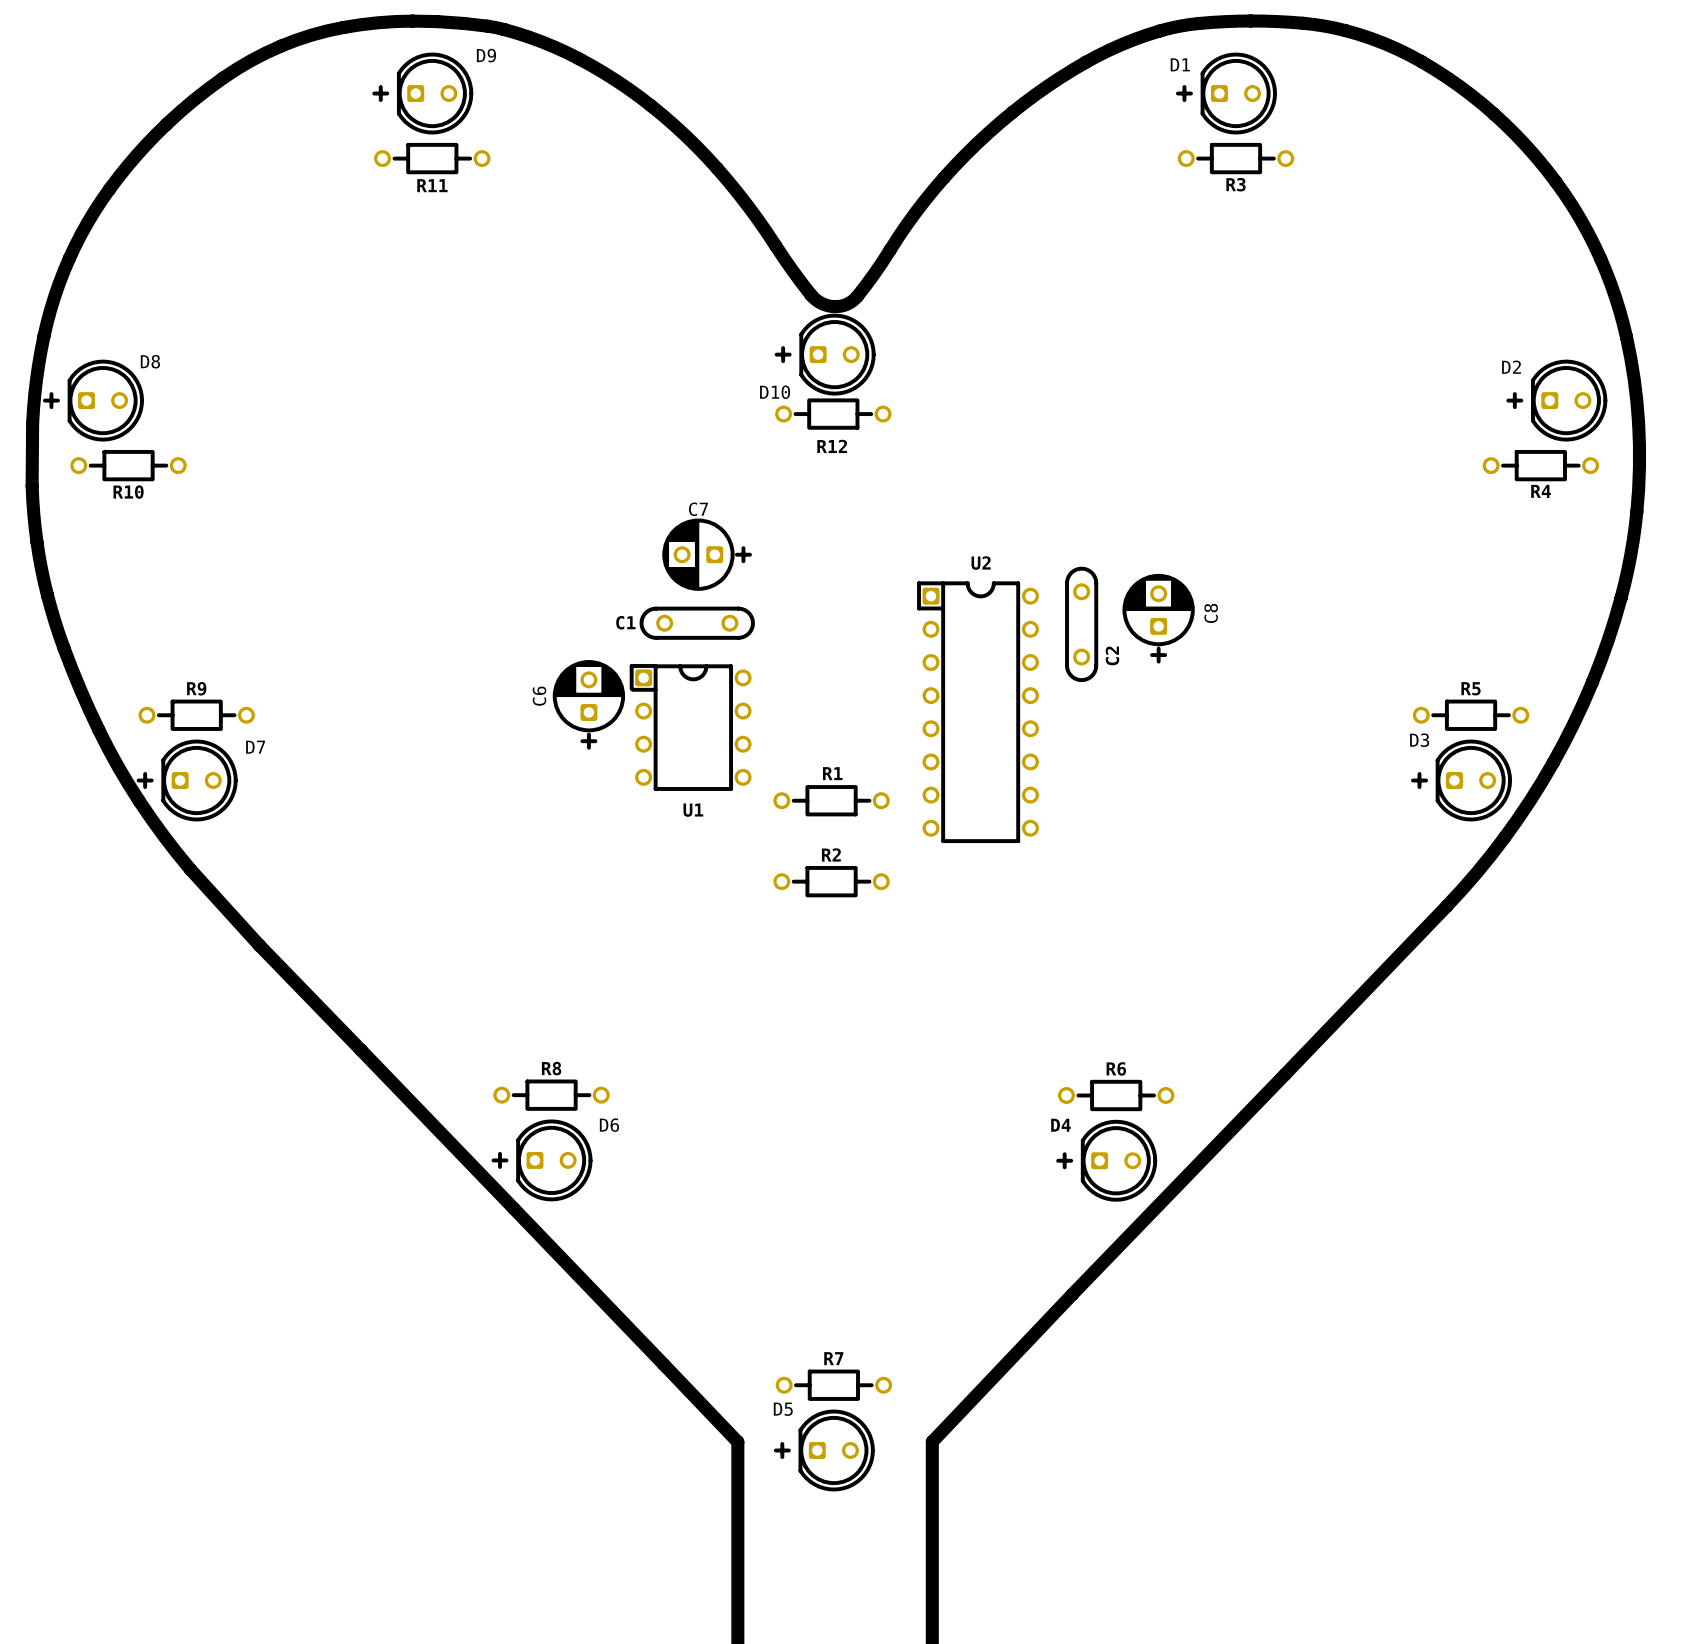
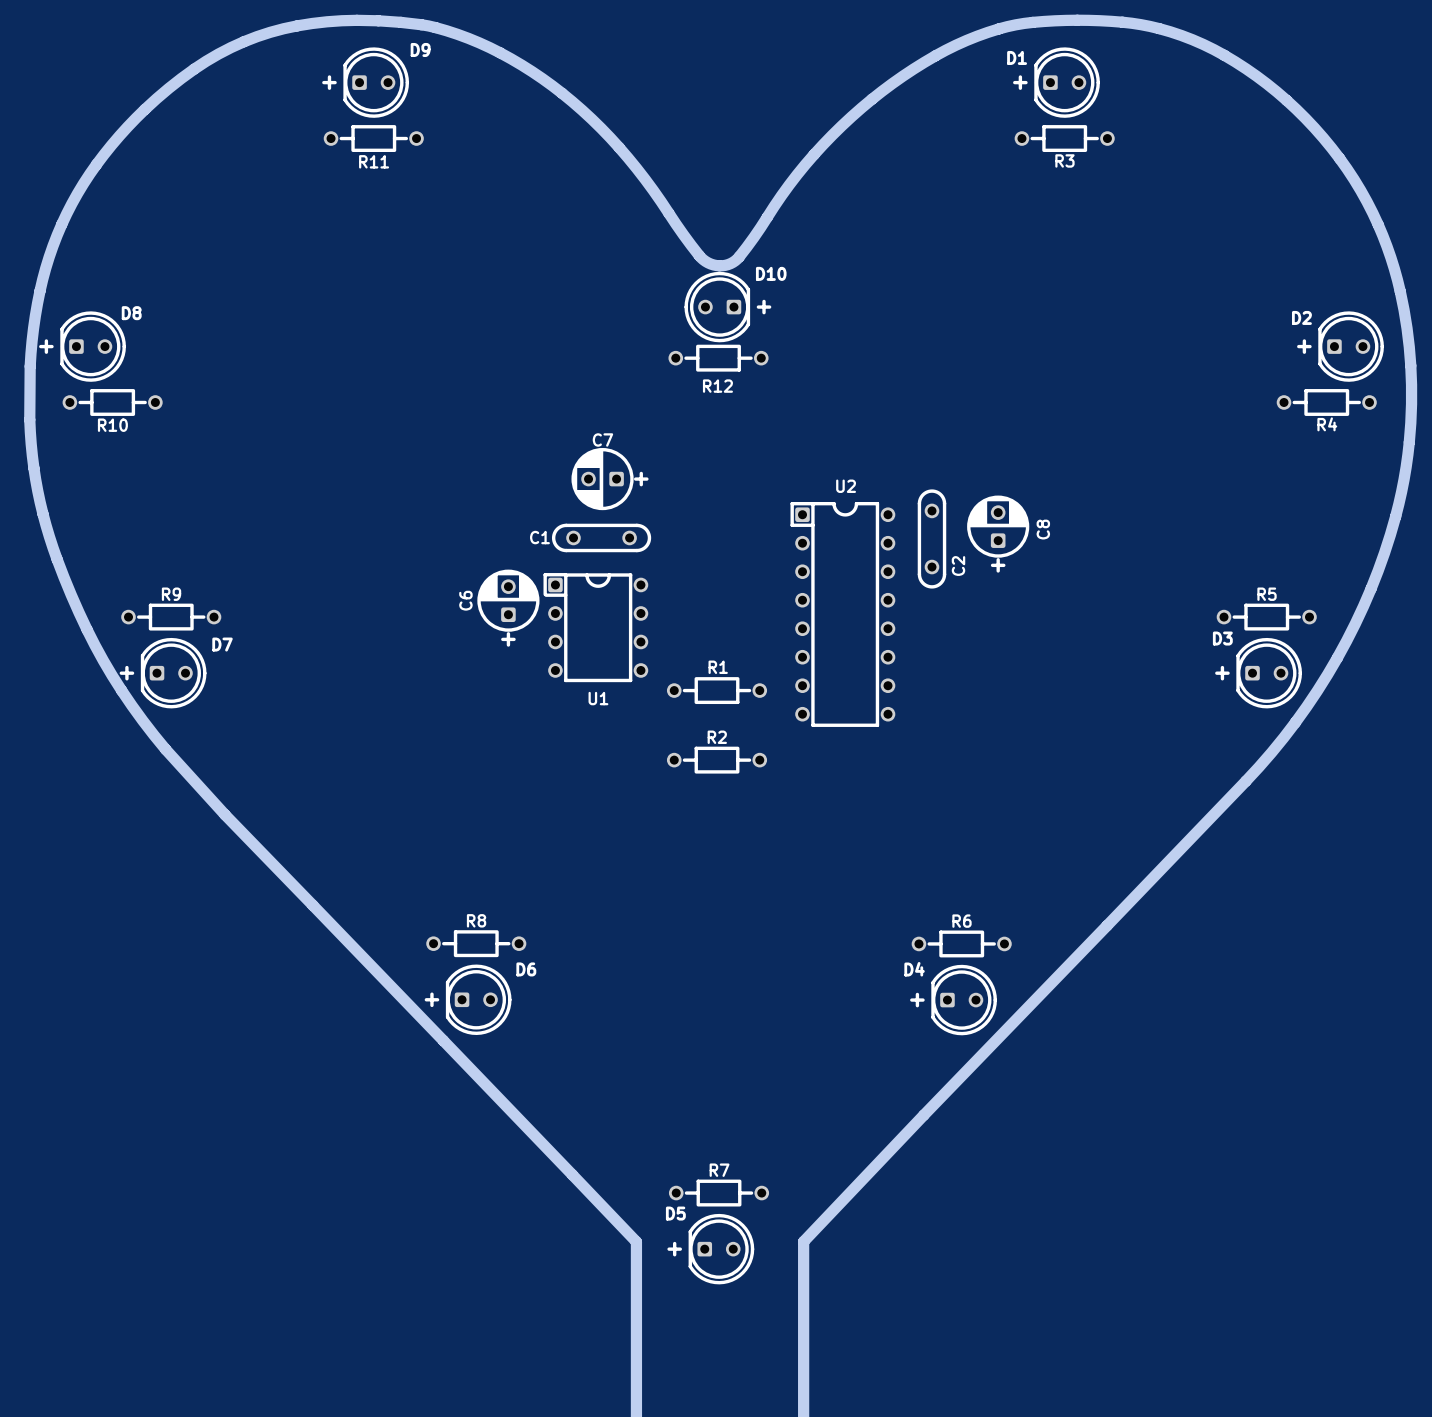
D10 rotation: 0° (825, 354) -> 180° (727, 307)

